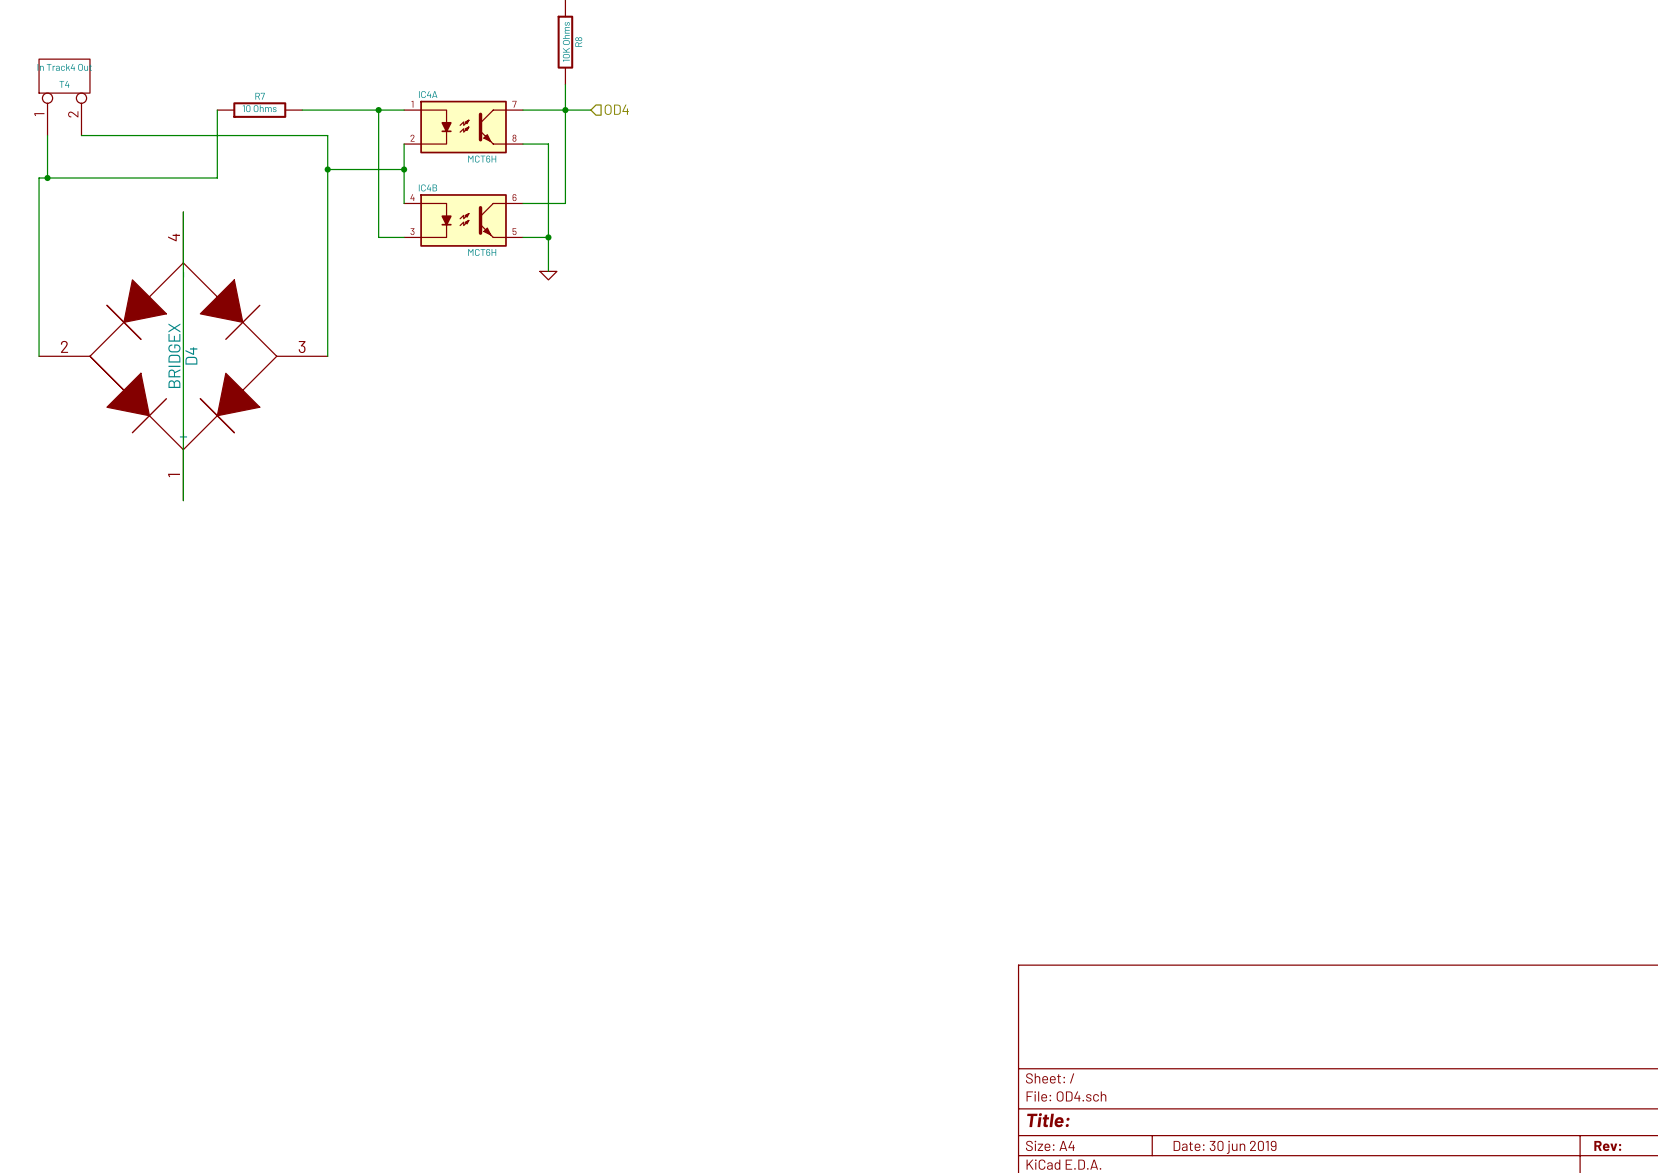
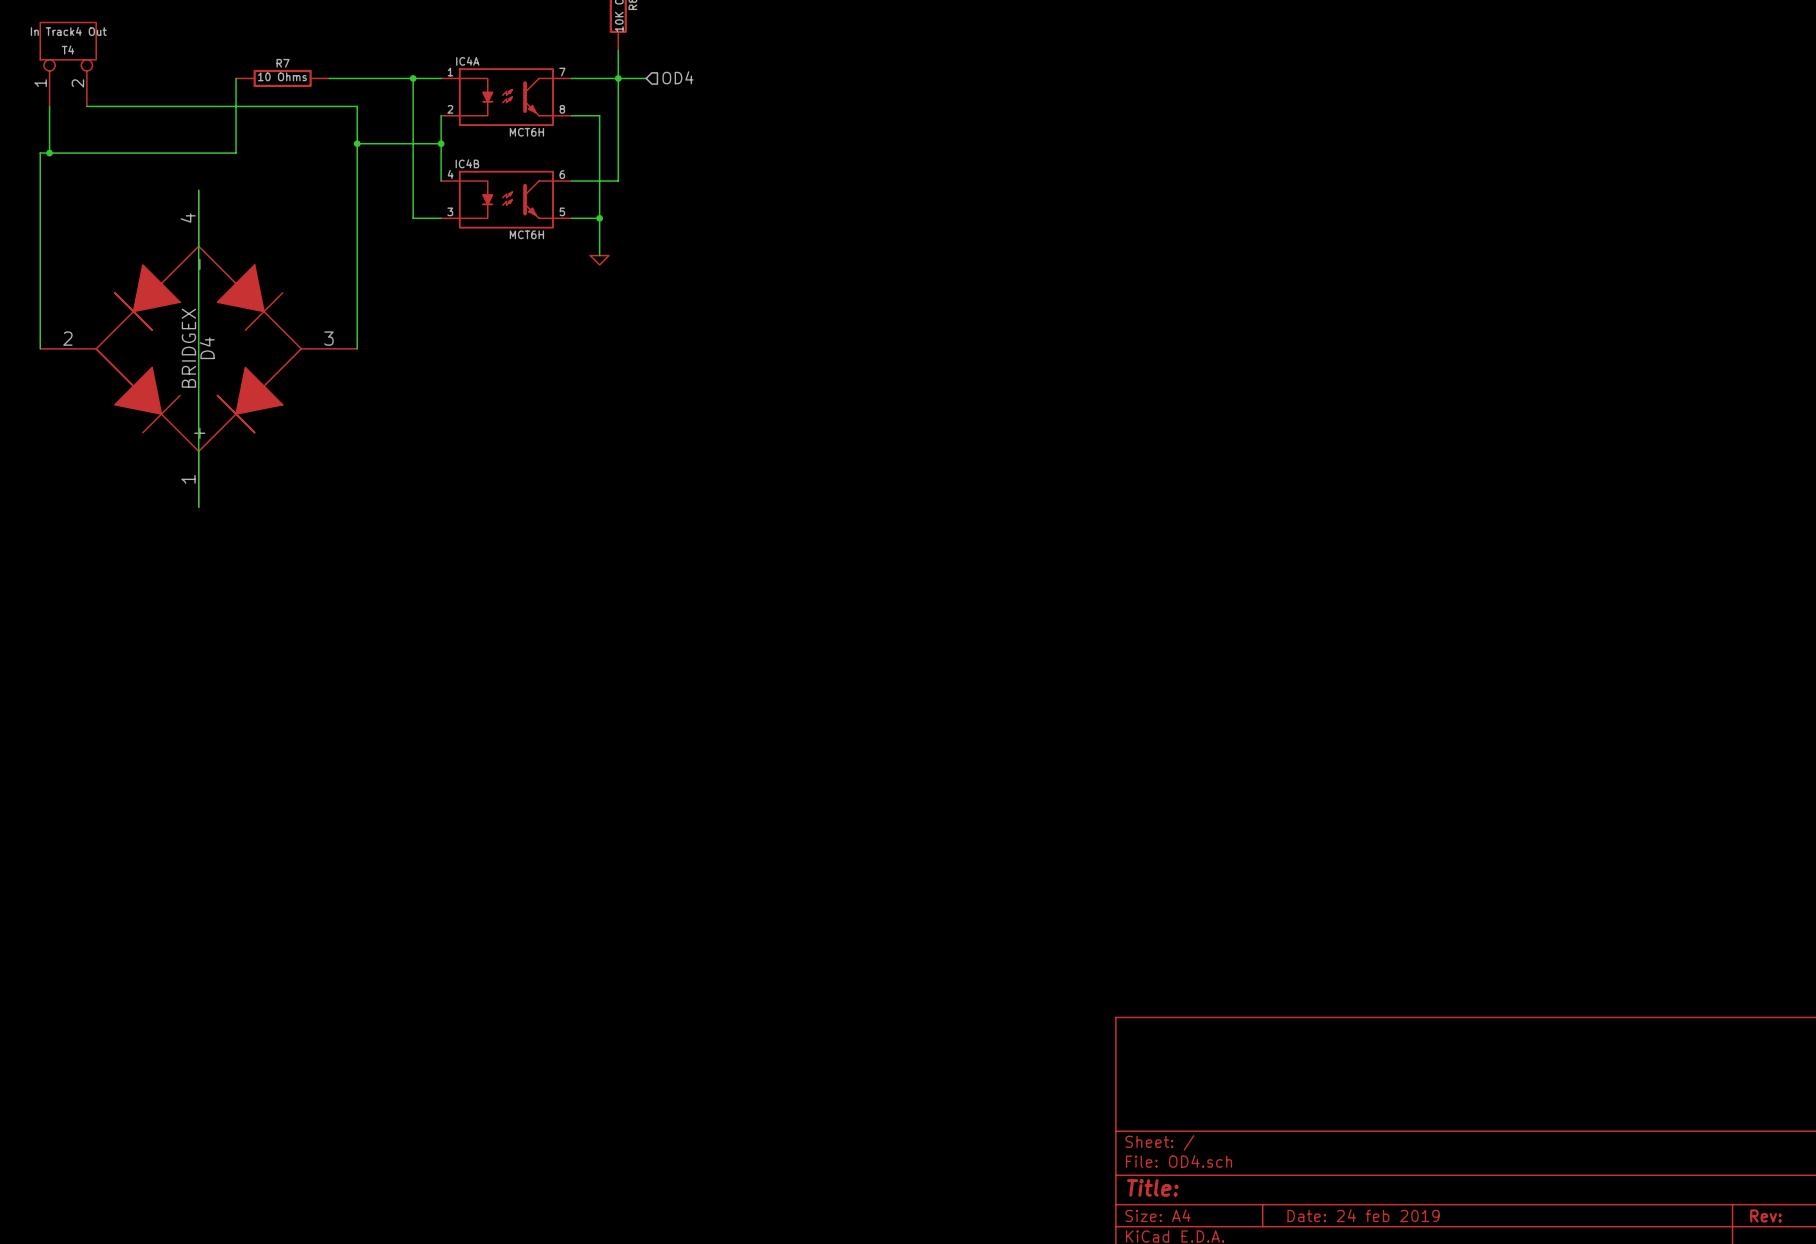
title block: Date: 30 jun 2019 (1225, 1147) -> Date: 24 feb 2019 (1363, 1215)

